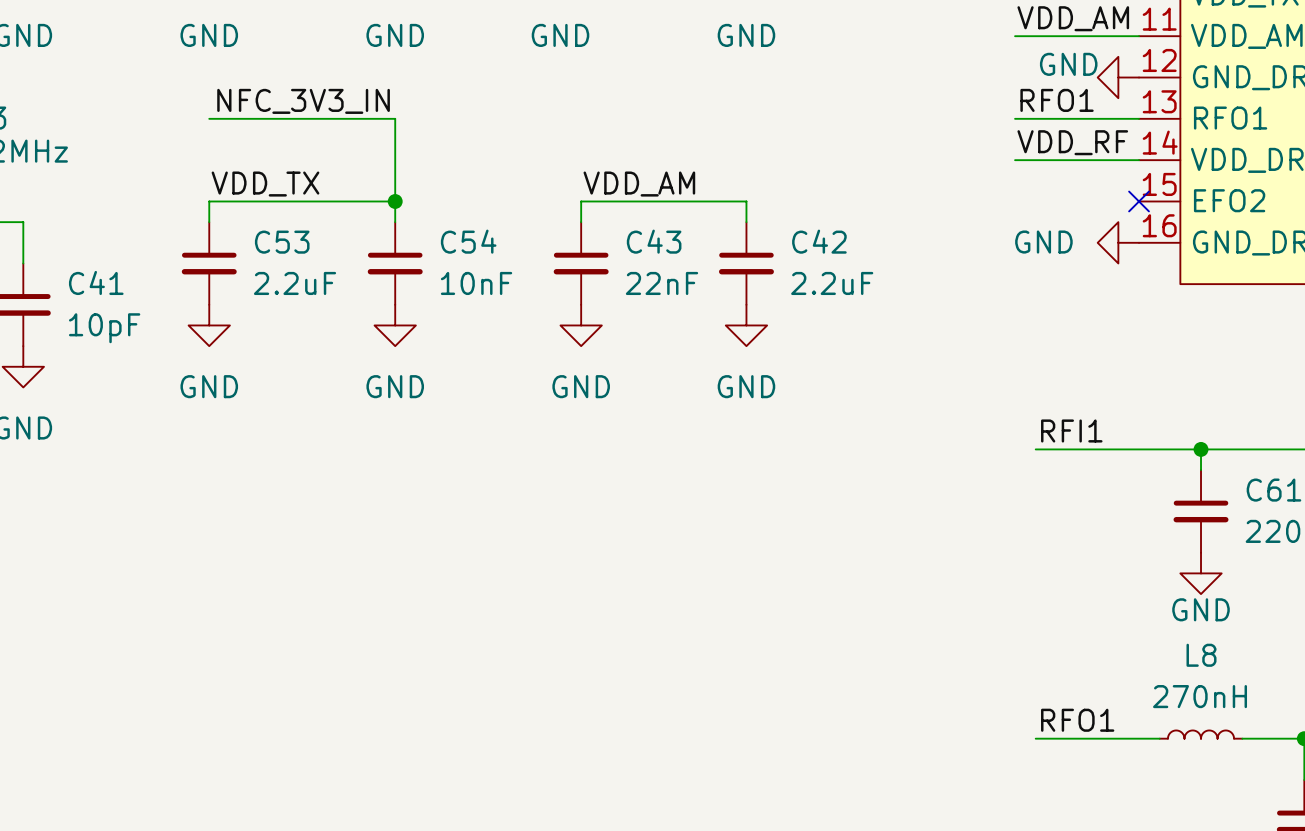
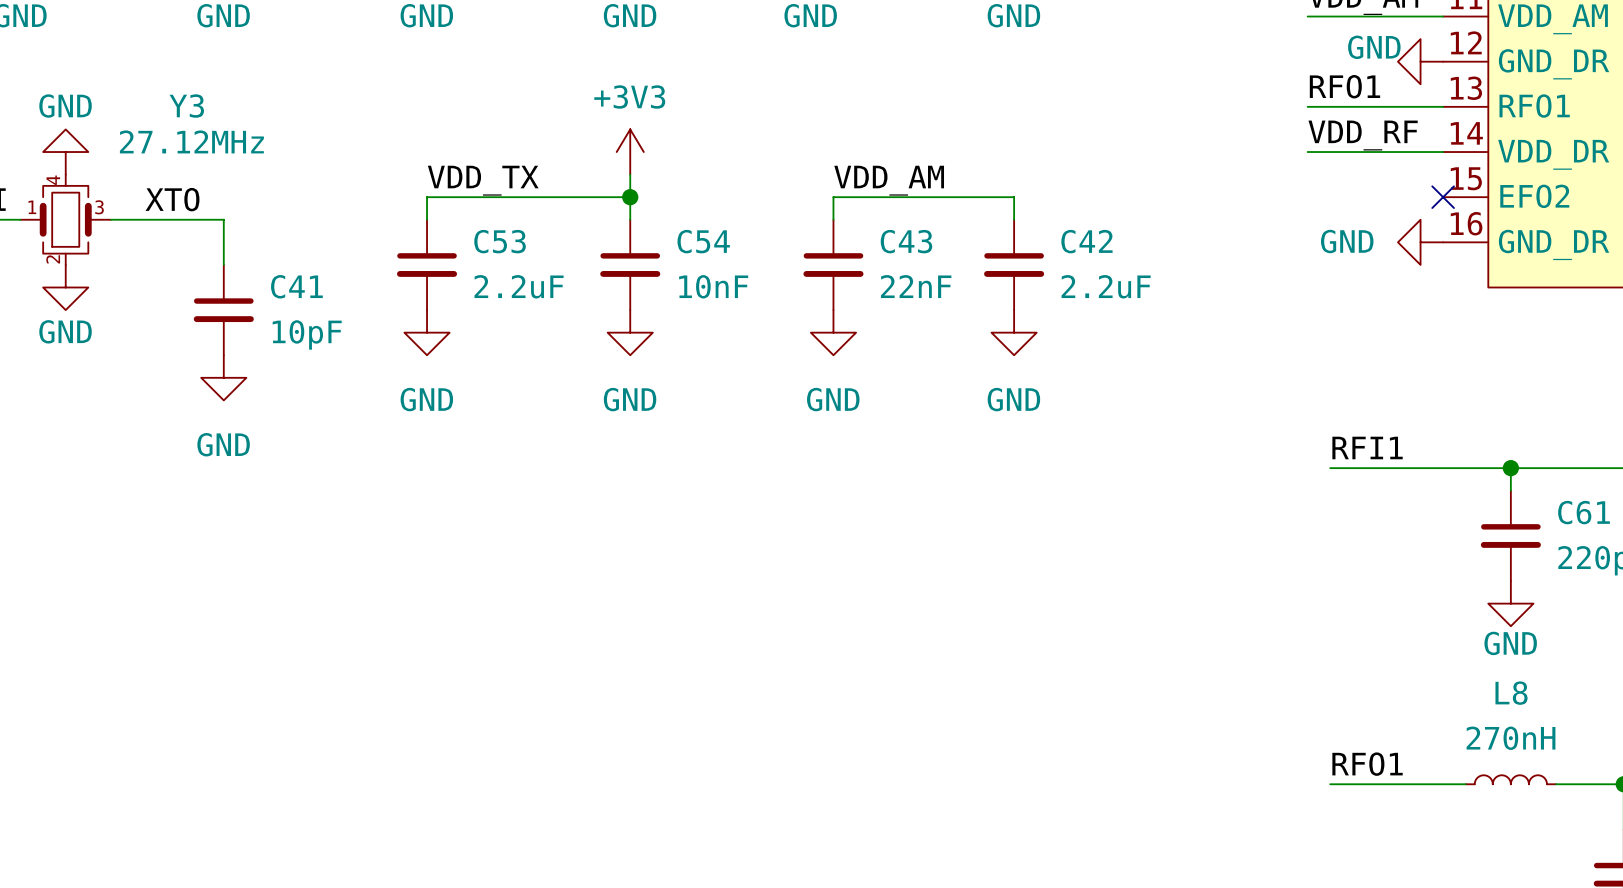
label: NFC_3V3_IN (303, 101) -> none
wire: (209, 118) (395, 118) (395, 180) -> none
power symbol: none -> +3V3 (630, 152)

